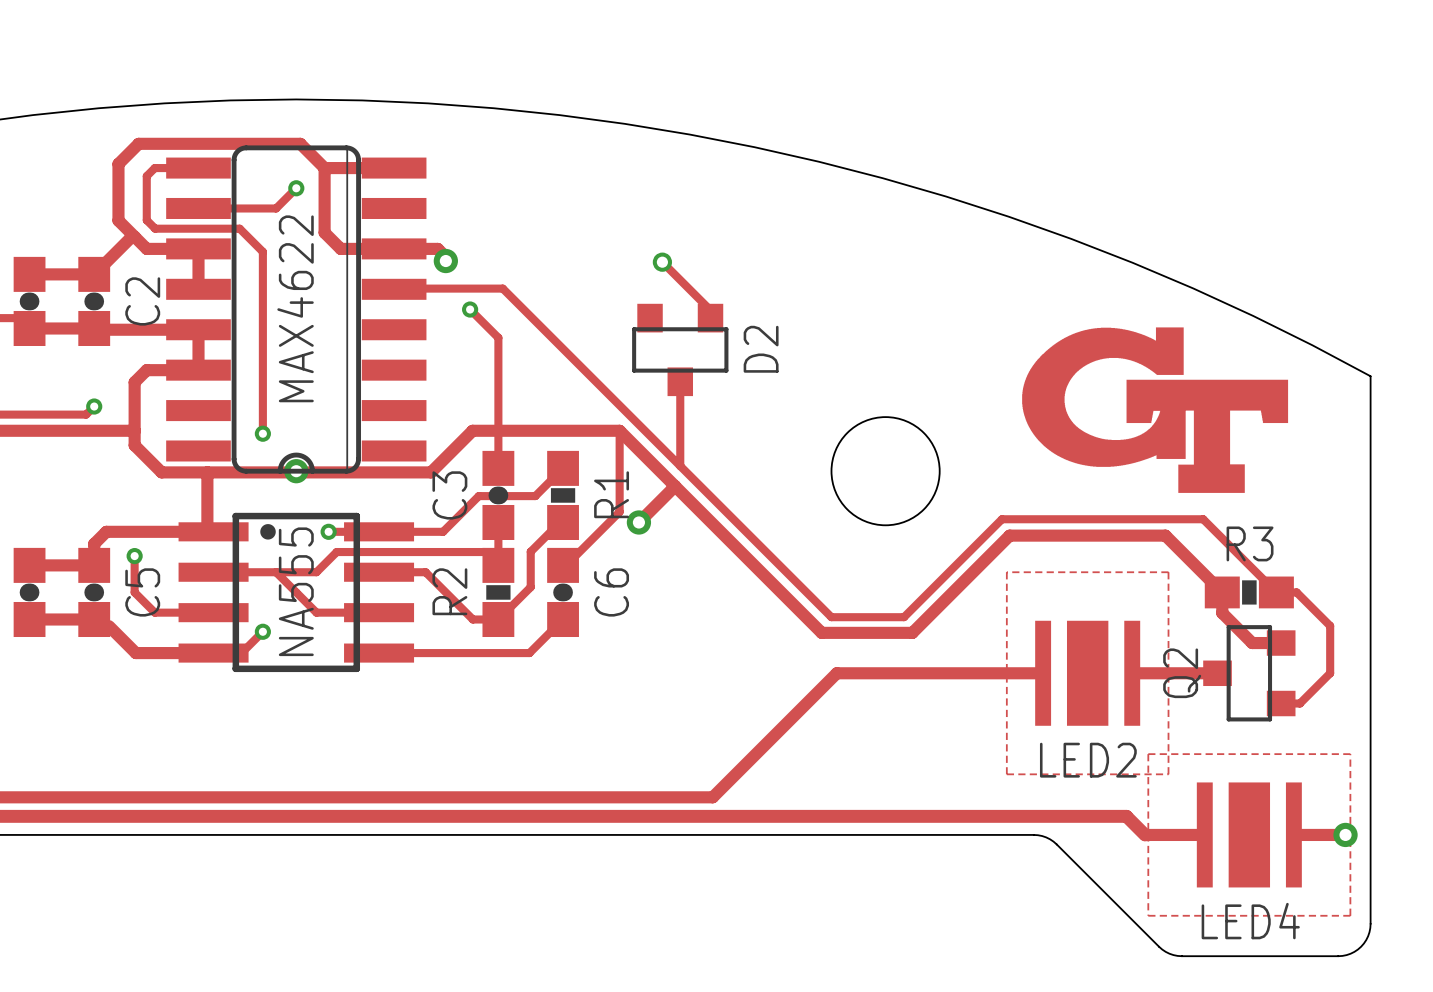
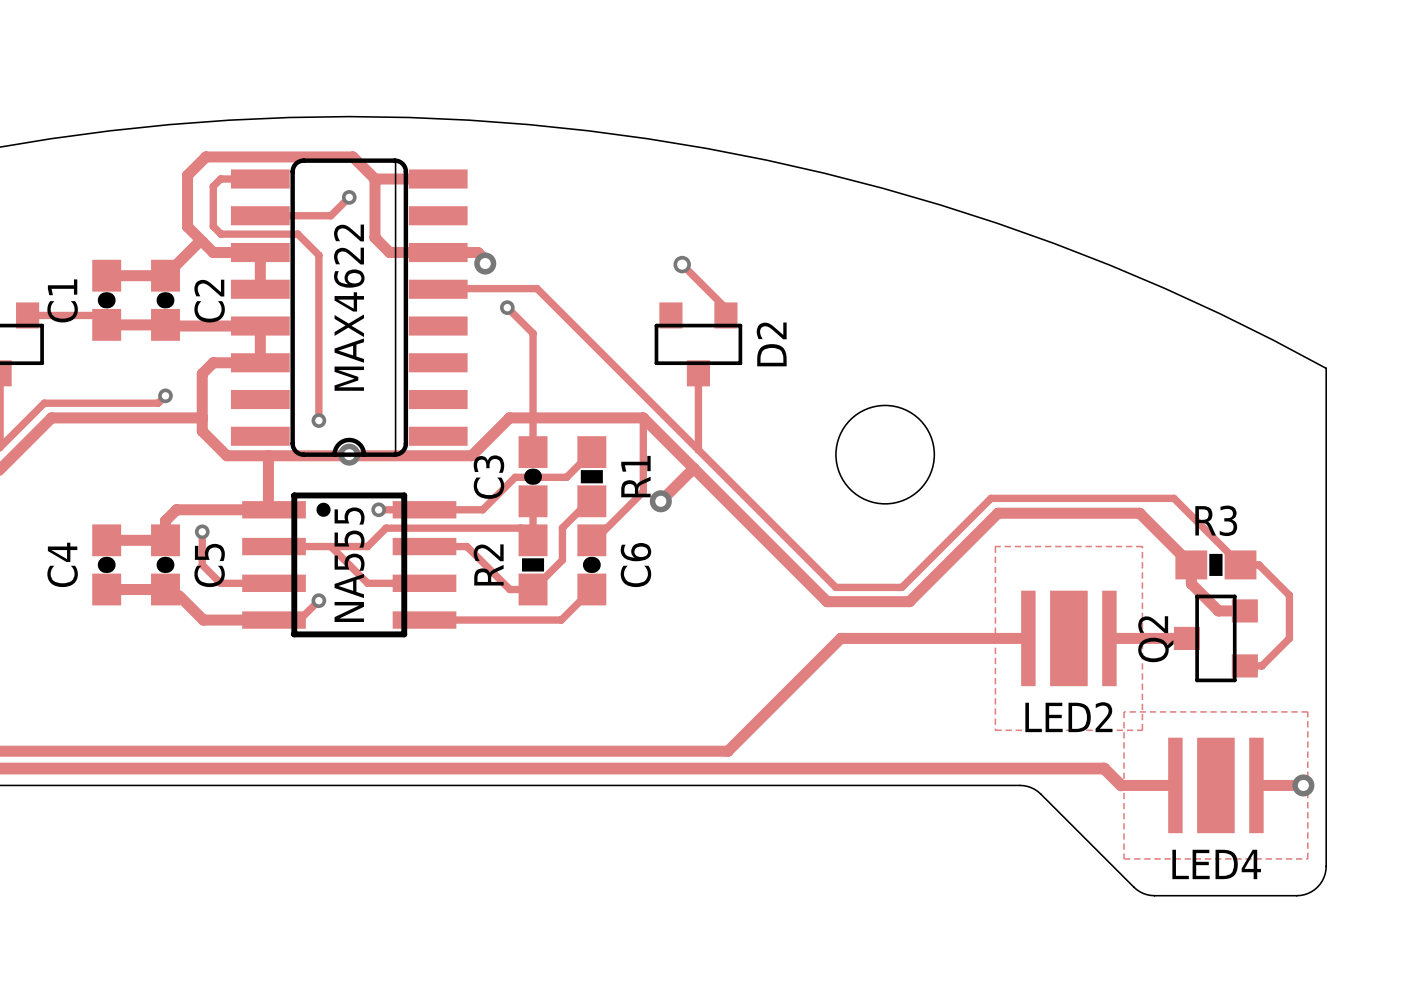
drawing: [1022, 327, 1289, 493] -> none

